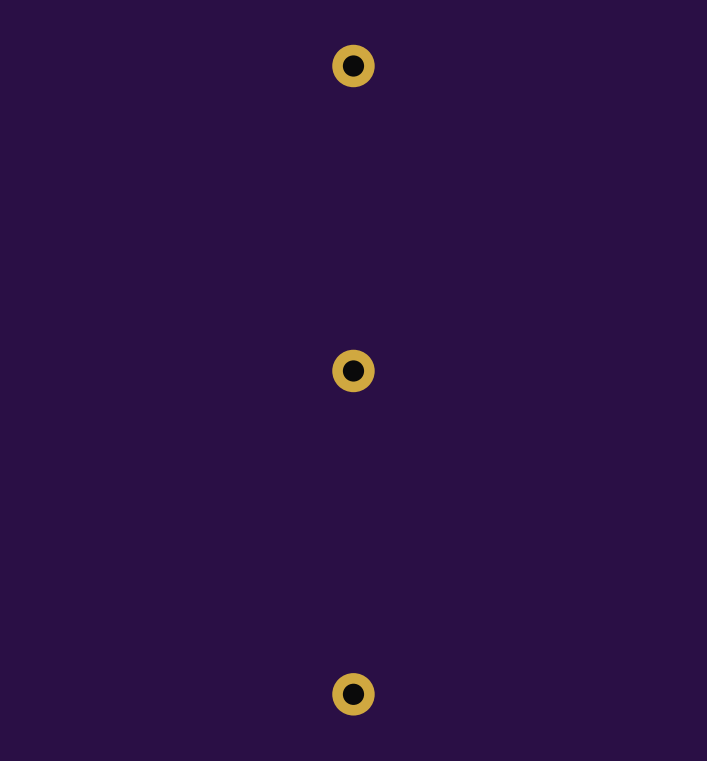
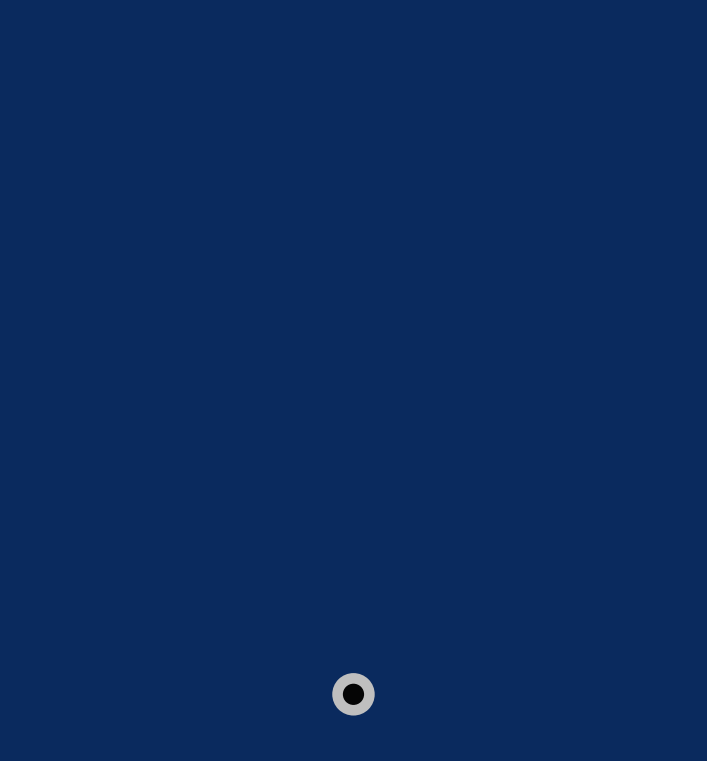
via: (353, 65) -> none
via: (353, 370) -> none

